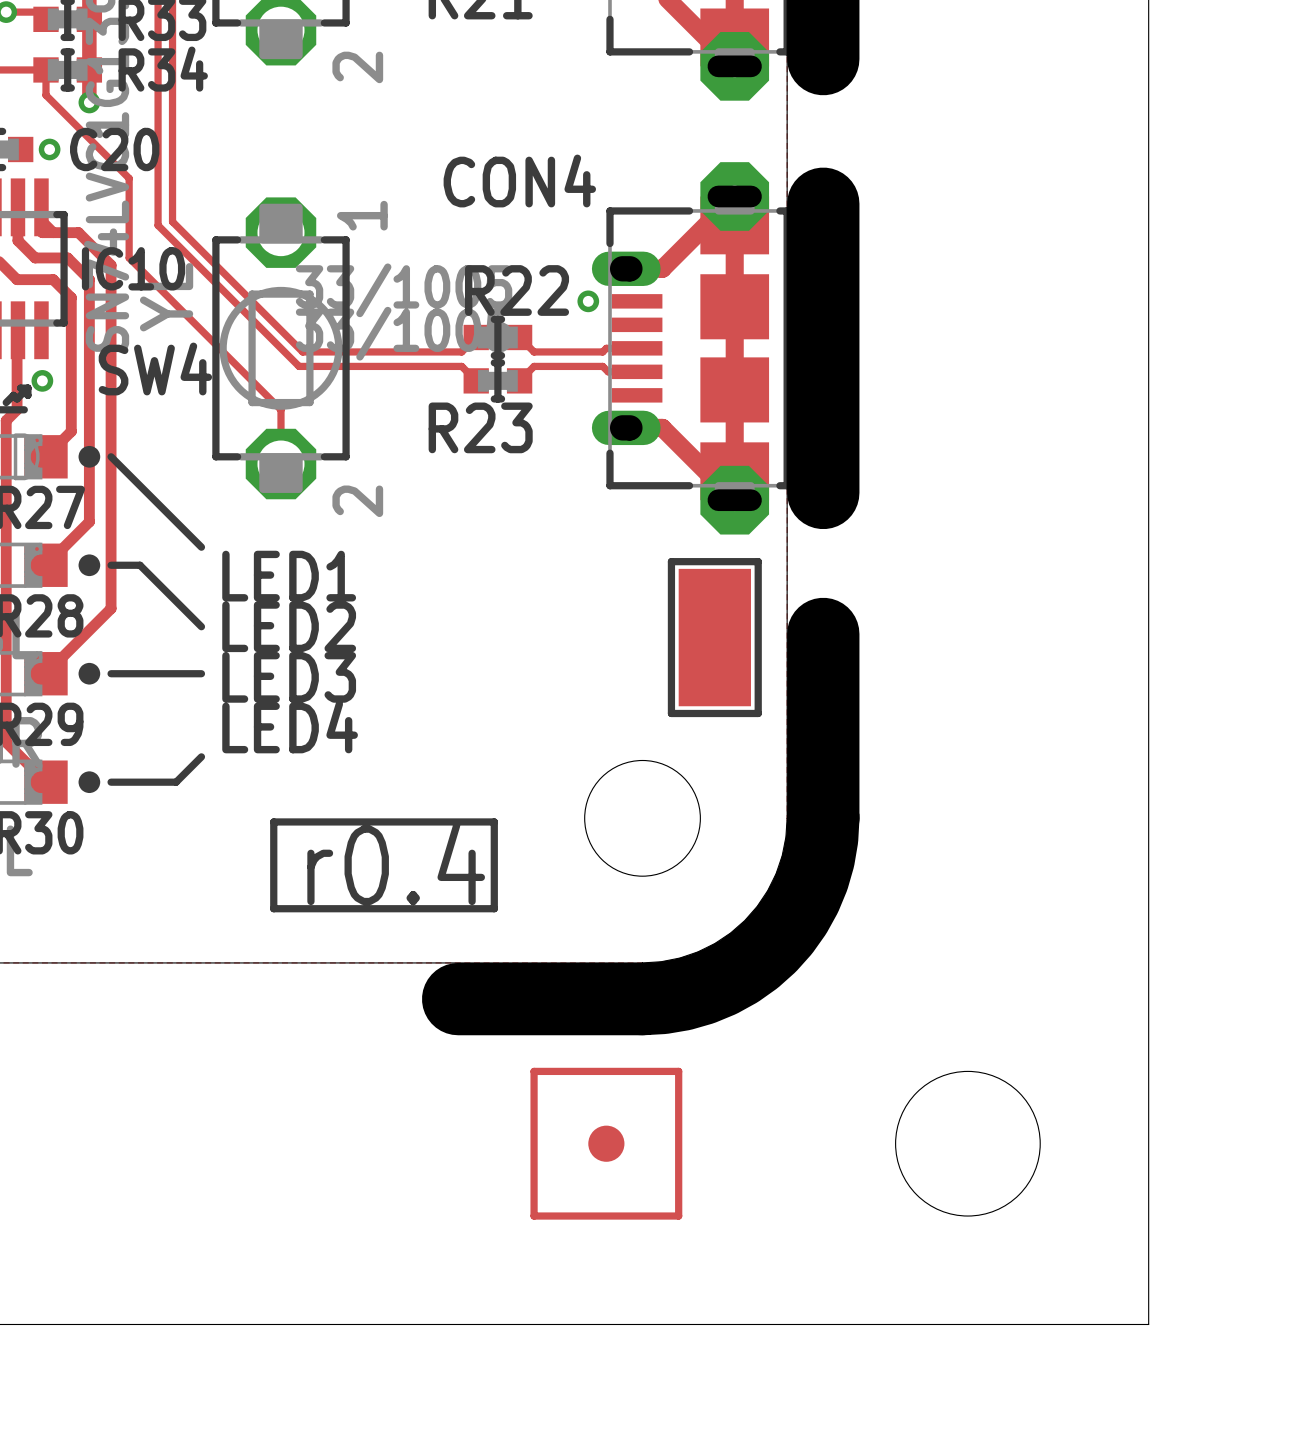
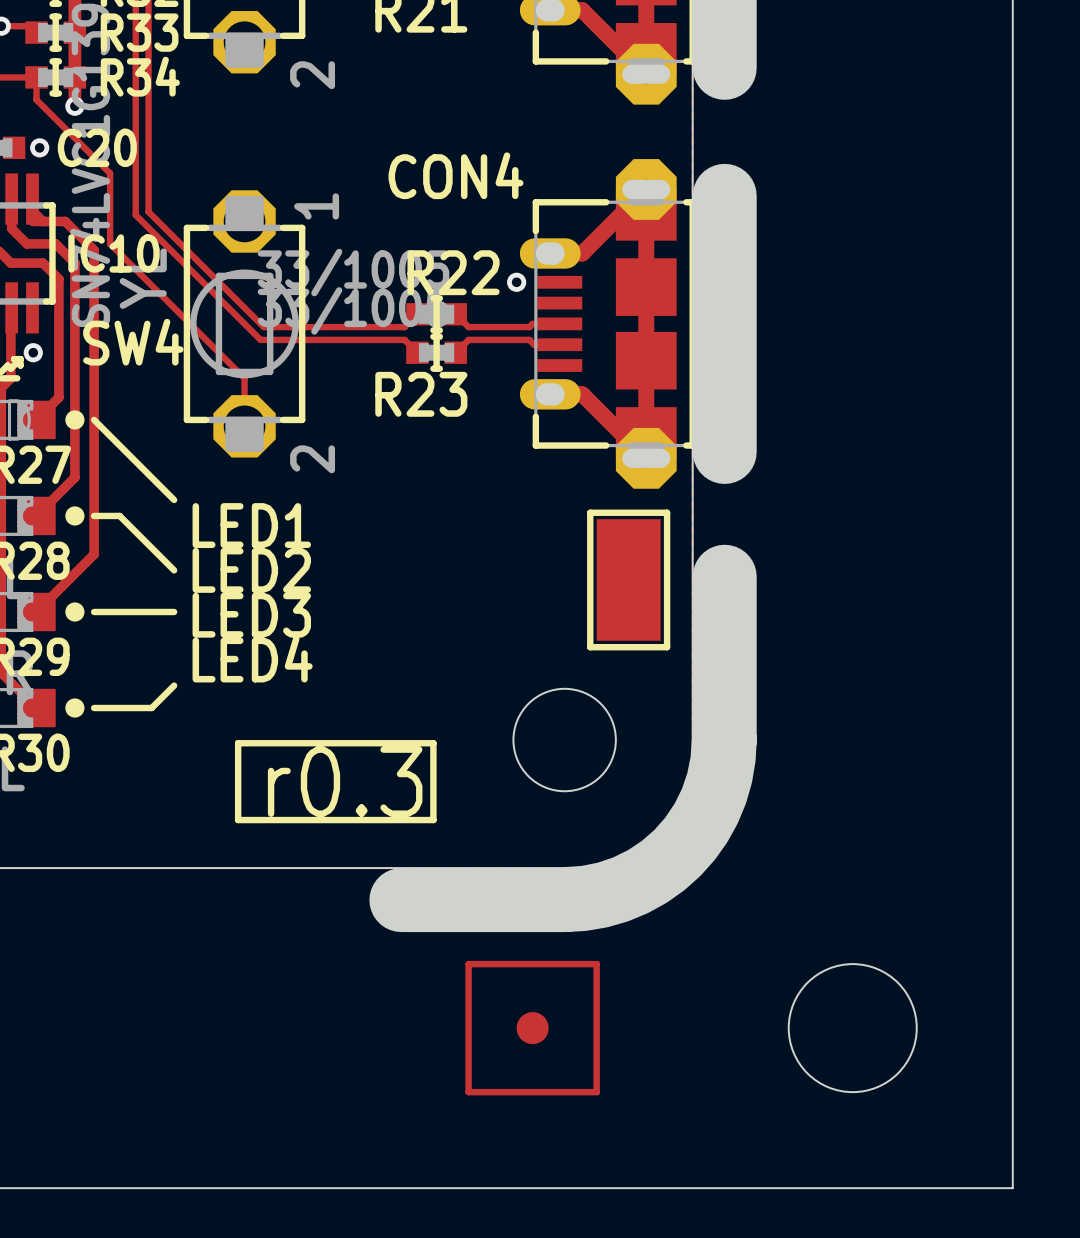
drawing shape: [270, 818, 498, 913] -> [234, 740, 437, 824]

